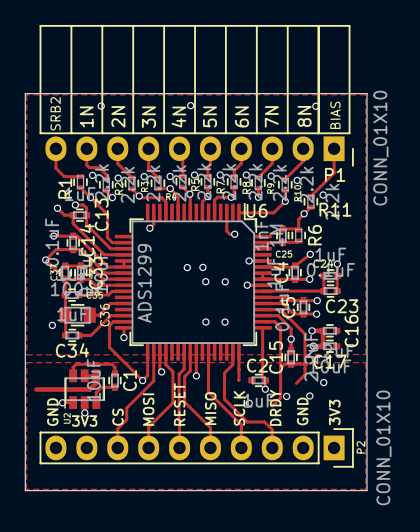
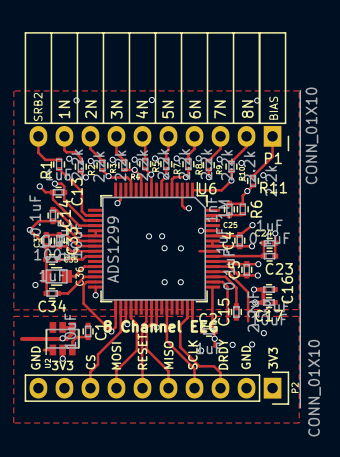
board edge: (367, 94) (25, 93) (25, 490) (367, 490) (367, 471) -> none
track: (53, 236) (73, 236) -> none
via: (53, 236) -> none
via: (247, 285) -> none
via: (291, 339) -> none
track: (306, 364) (284, 364) (280, 368) -> none
track: (280, 368) (280, 397) (272, 406) -> none
track: (305, 368) (305, 374) (296, 383) -> none
track: (114, 373) (114, 367) (112, 364) (76, 364) (73, 367) (73, 375) -> none
text: none -> 8 Channel EEG (160, 326)
track: none -> (214, 338) (214, 346)
via position: (62, 402) -> (62, 338)

